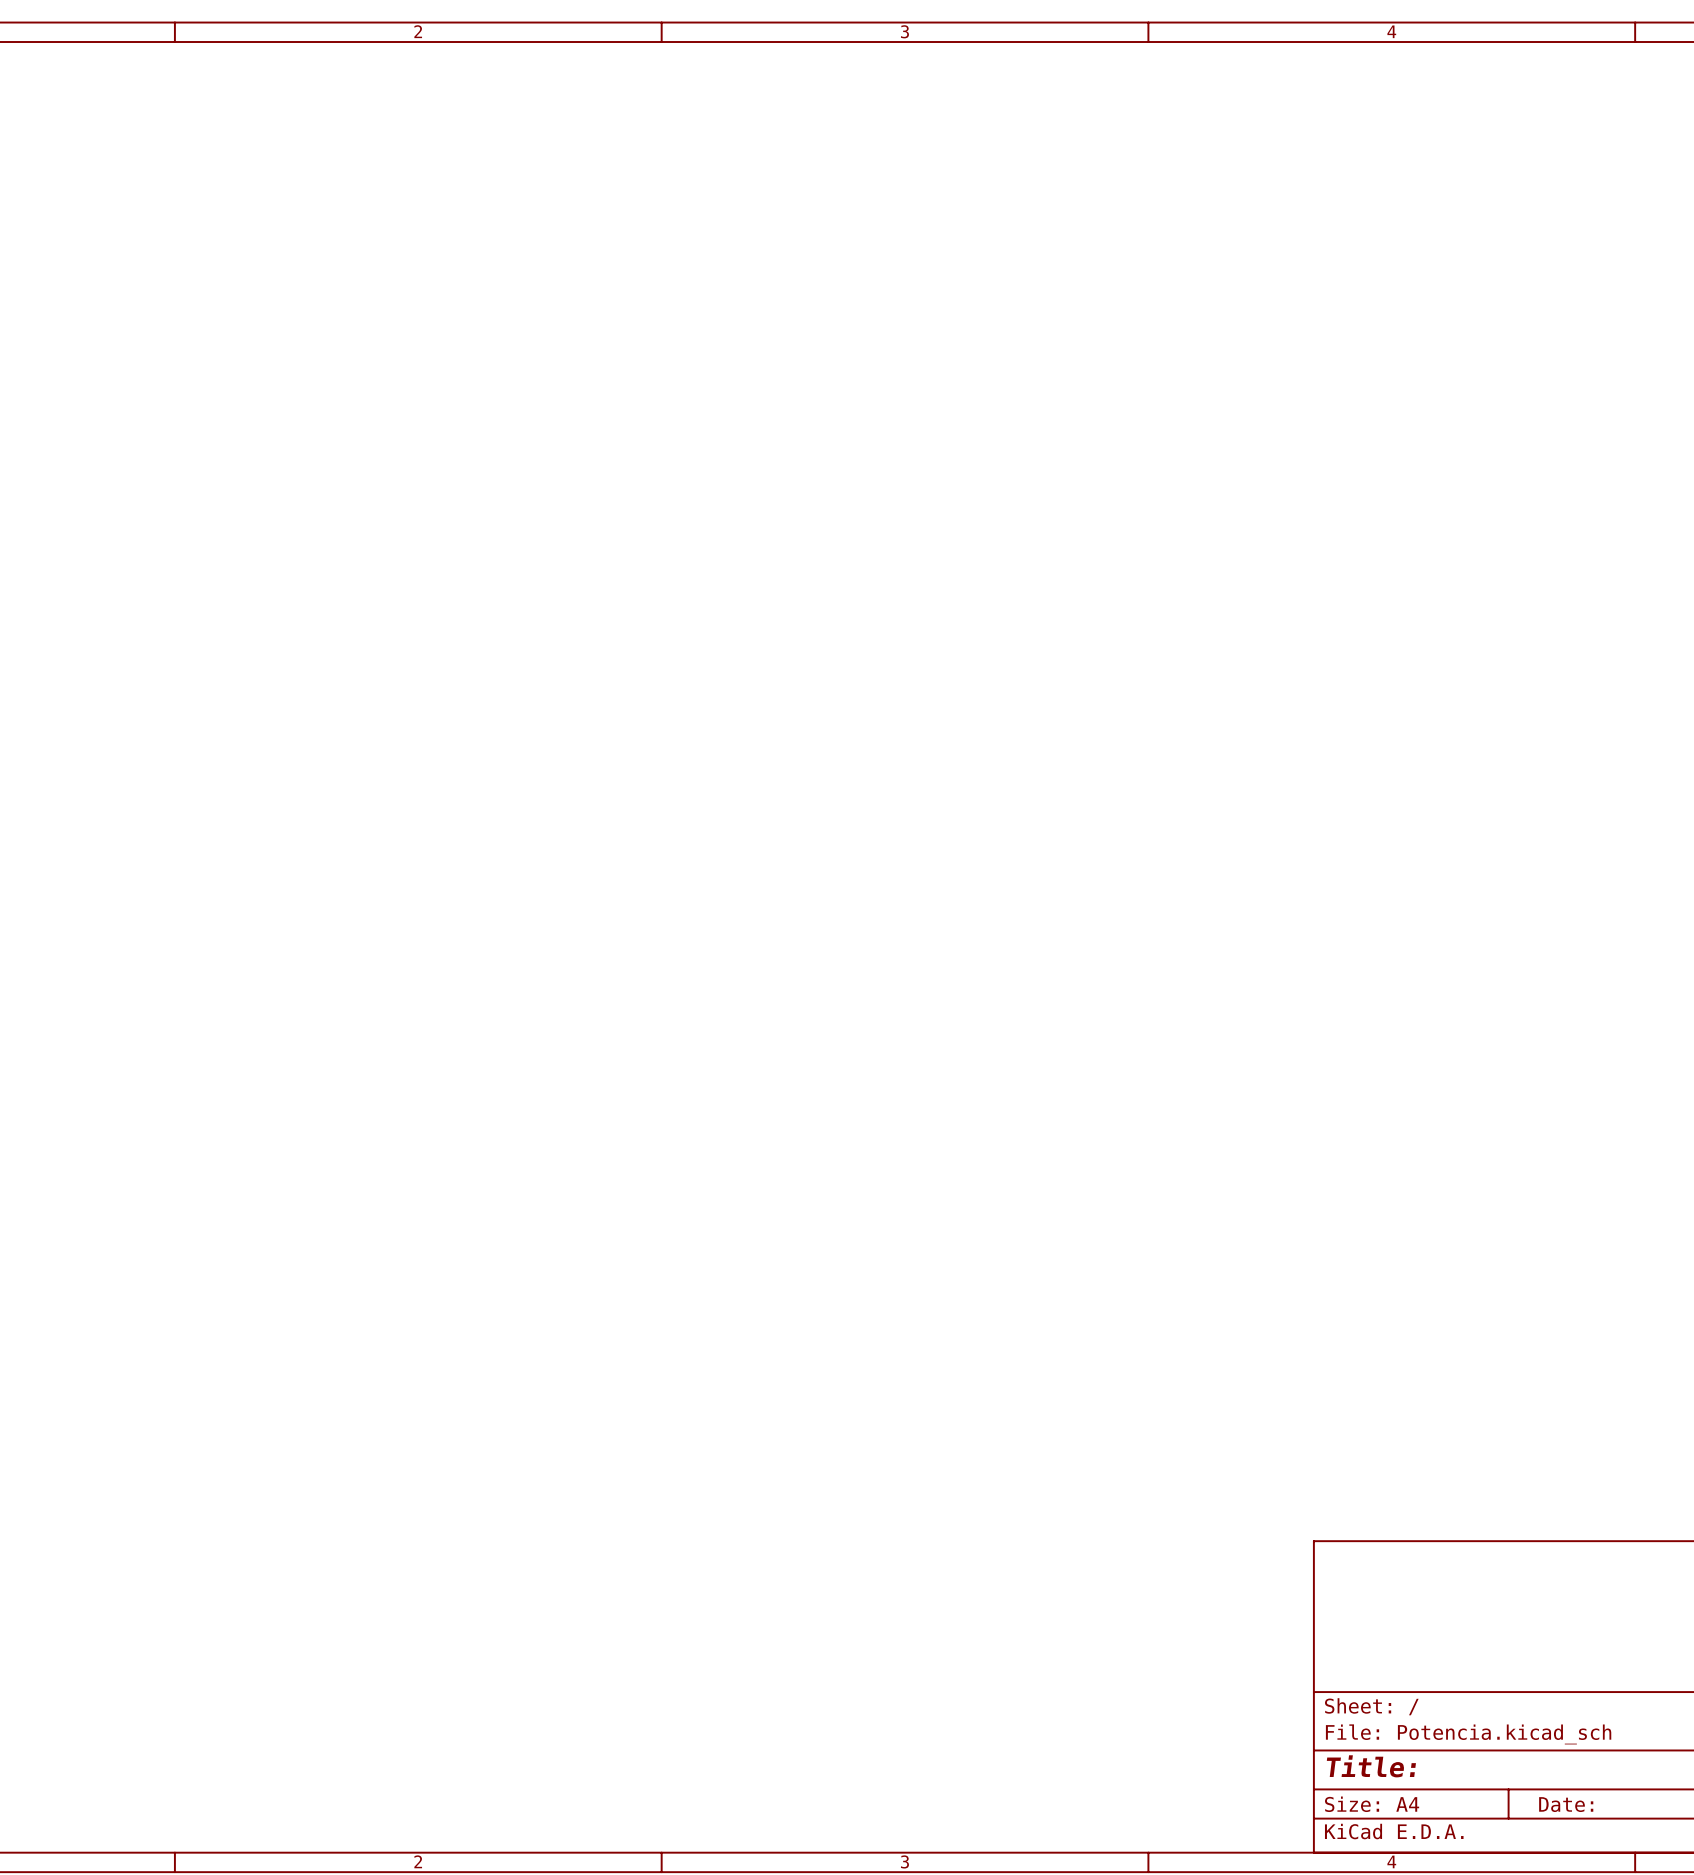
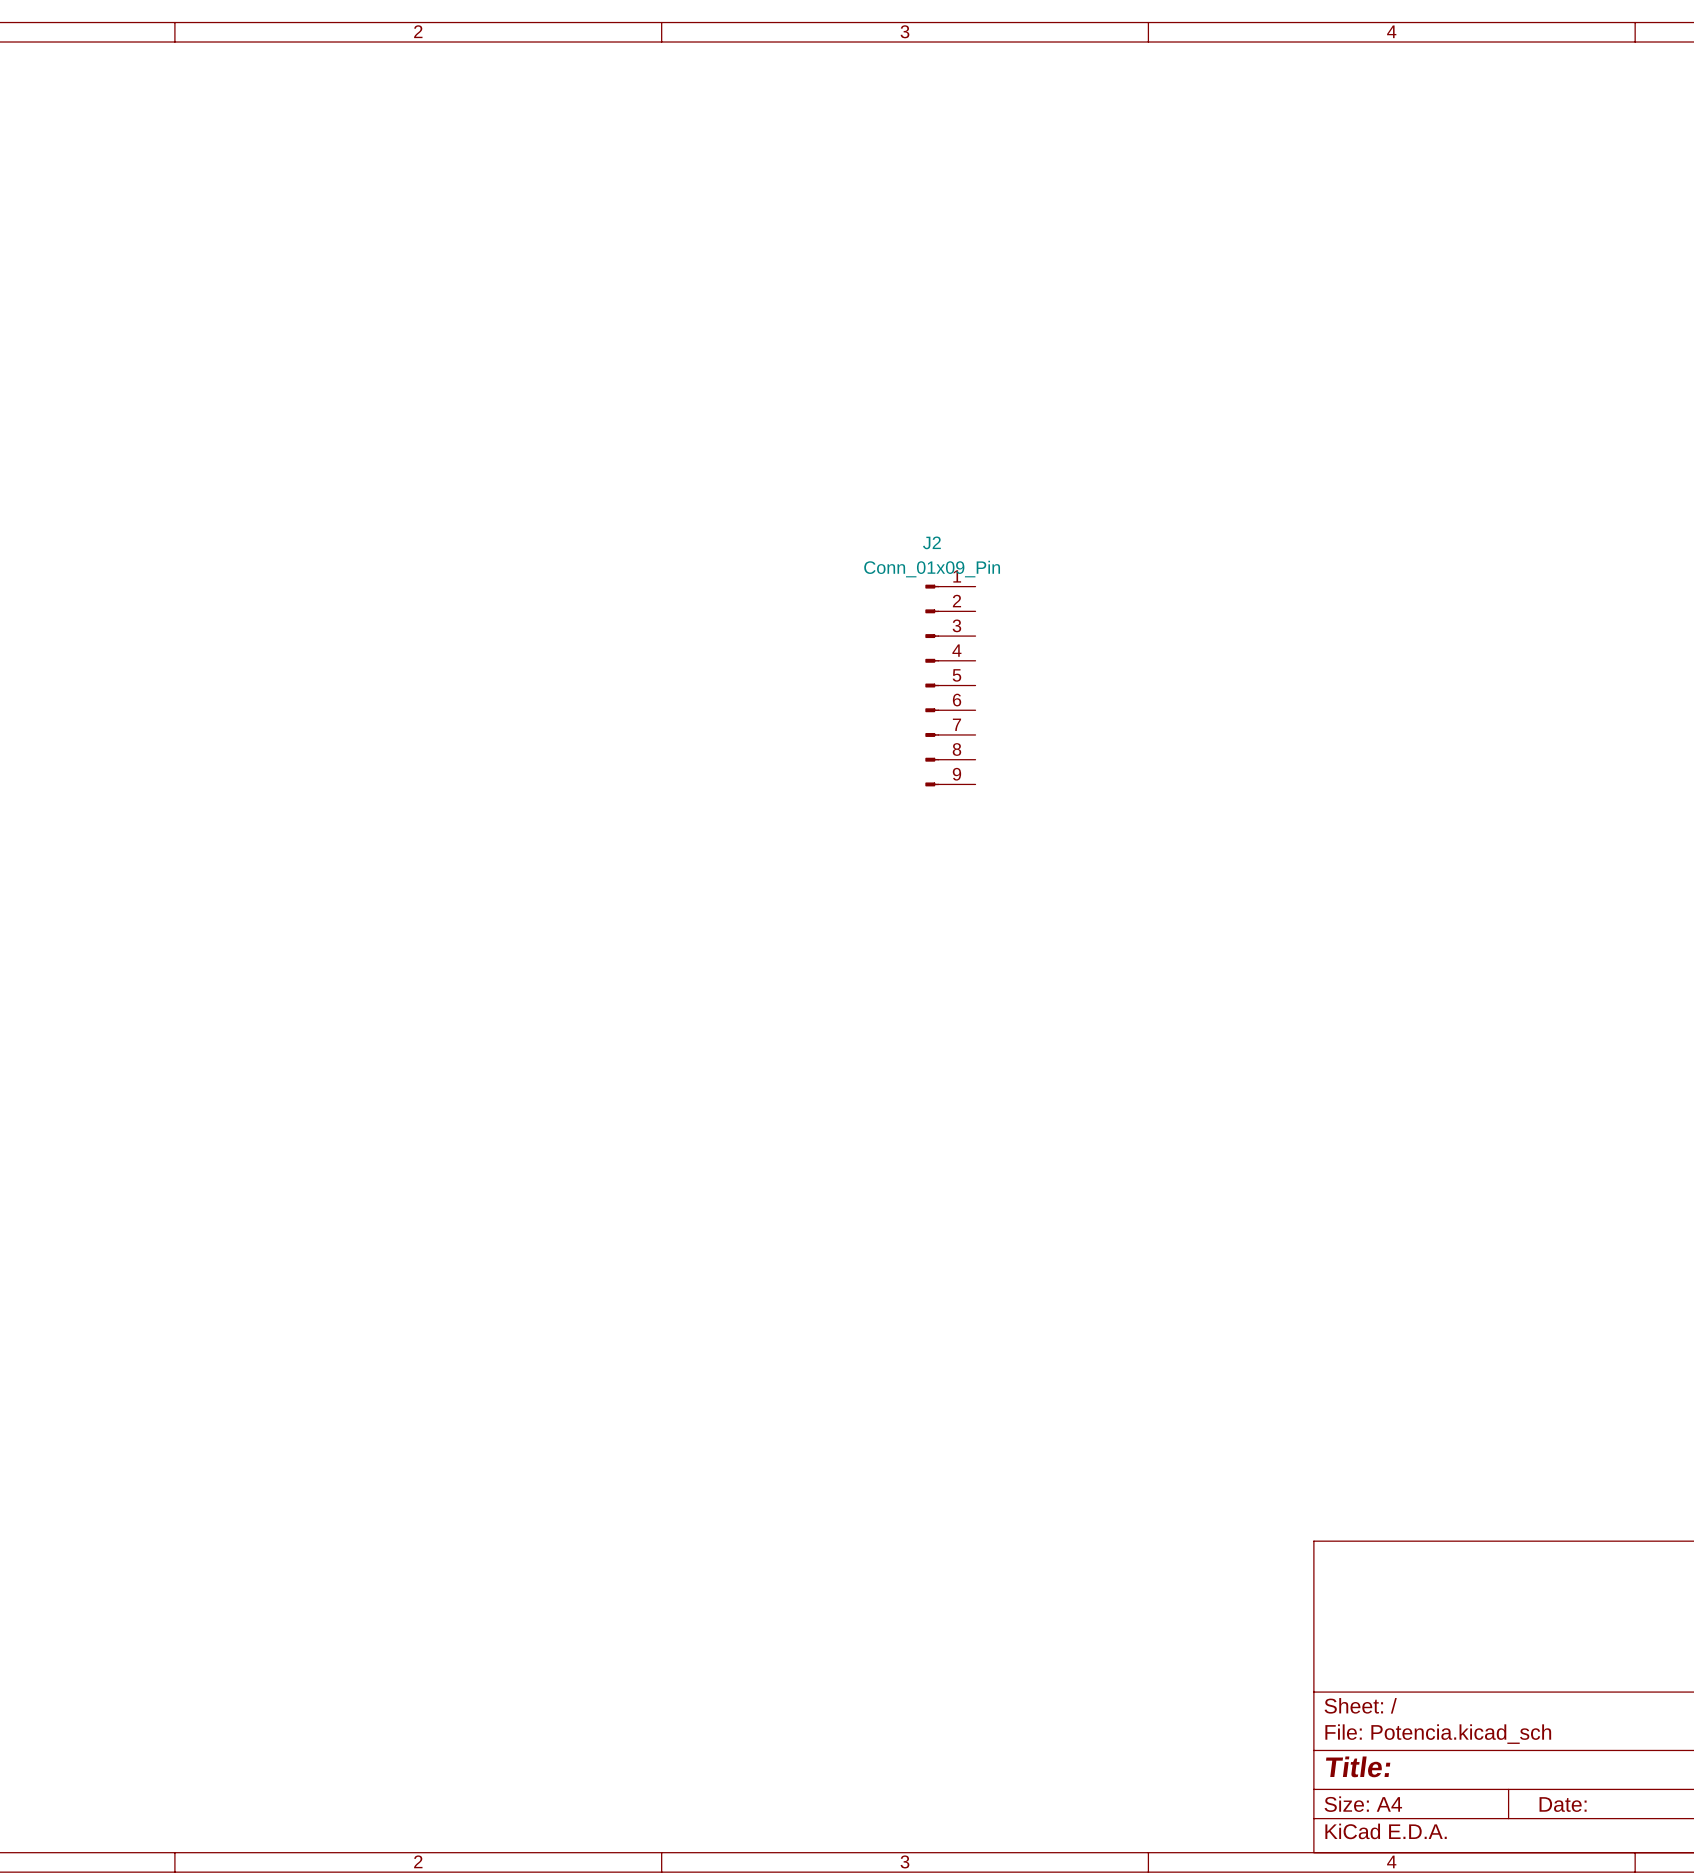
J2: none -> Conn_01x09_Pin (950, 685)

